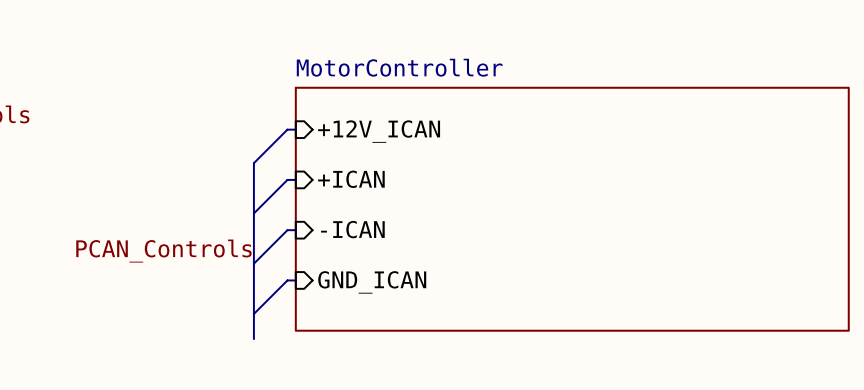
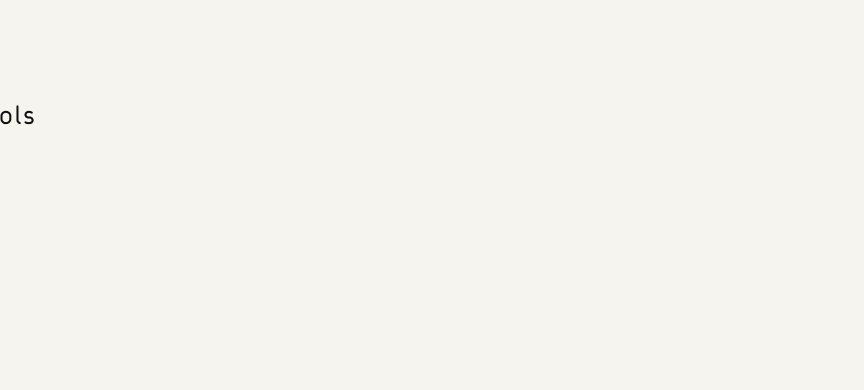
wire: (295, 129) (287, 129) (253, 163) -> none
sheet pin: +12V_ICAN (379, 131) -> none
bus: (253, 163) (253, 339) -> none
wire: (295, 179) (287, 179) (253, 213) -> none
sheet pin: +ICAN (351, 179) -> none
sheet MotorController: (572, 209) -> none
sheet pin: -ICAN (352, 229) -> none
wire: (295, 230) (287, 230) (253, 263) -> none
label: PCAN_Controls (163, 251) -> none
wire: (295, 280) (287, 280) (253, 313) -> none
sheet pin: GND_ICAN (372, 282) -> none

